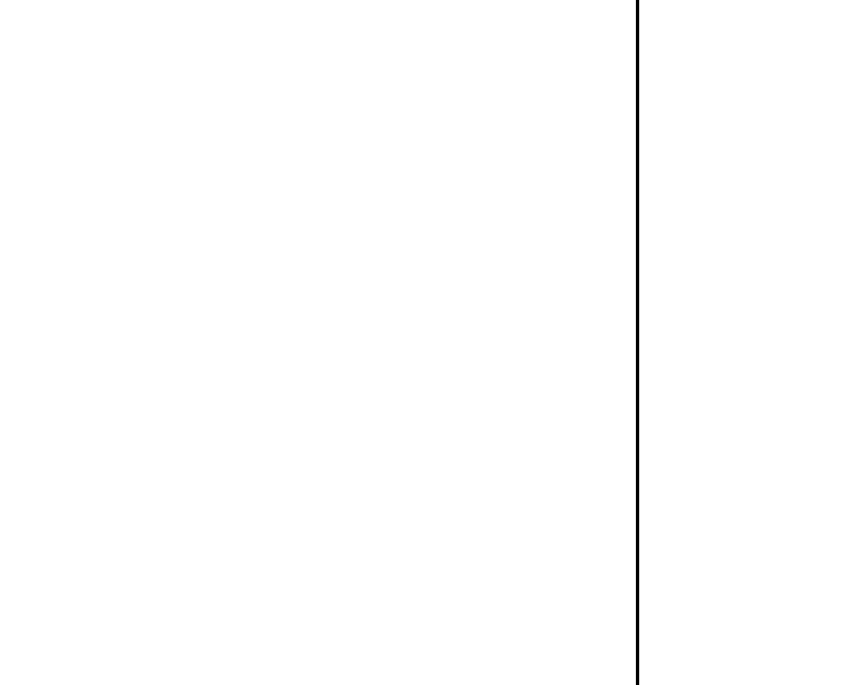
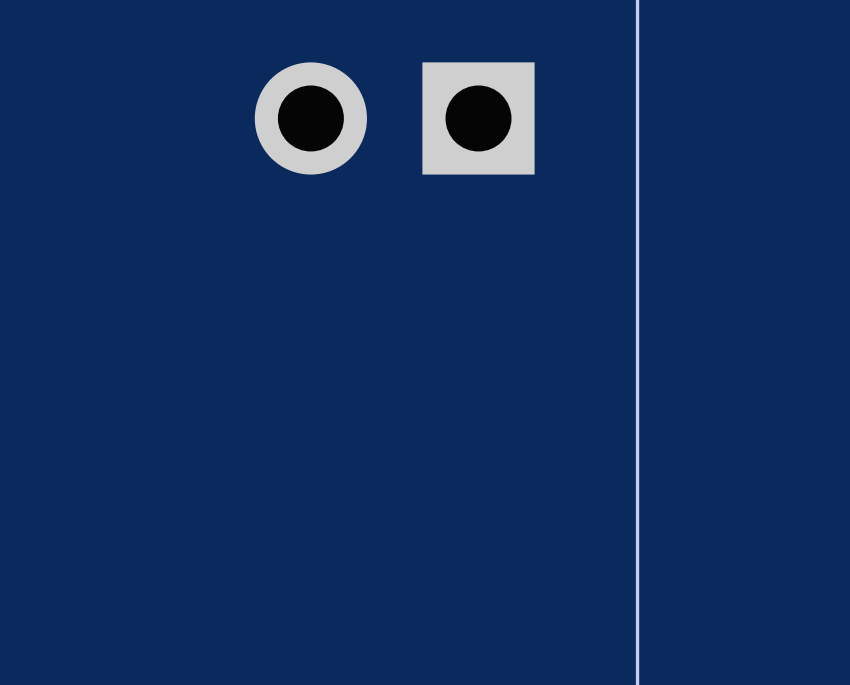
part: none -> (394, 118)

